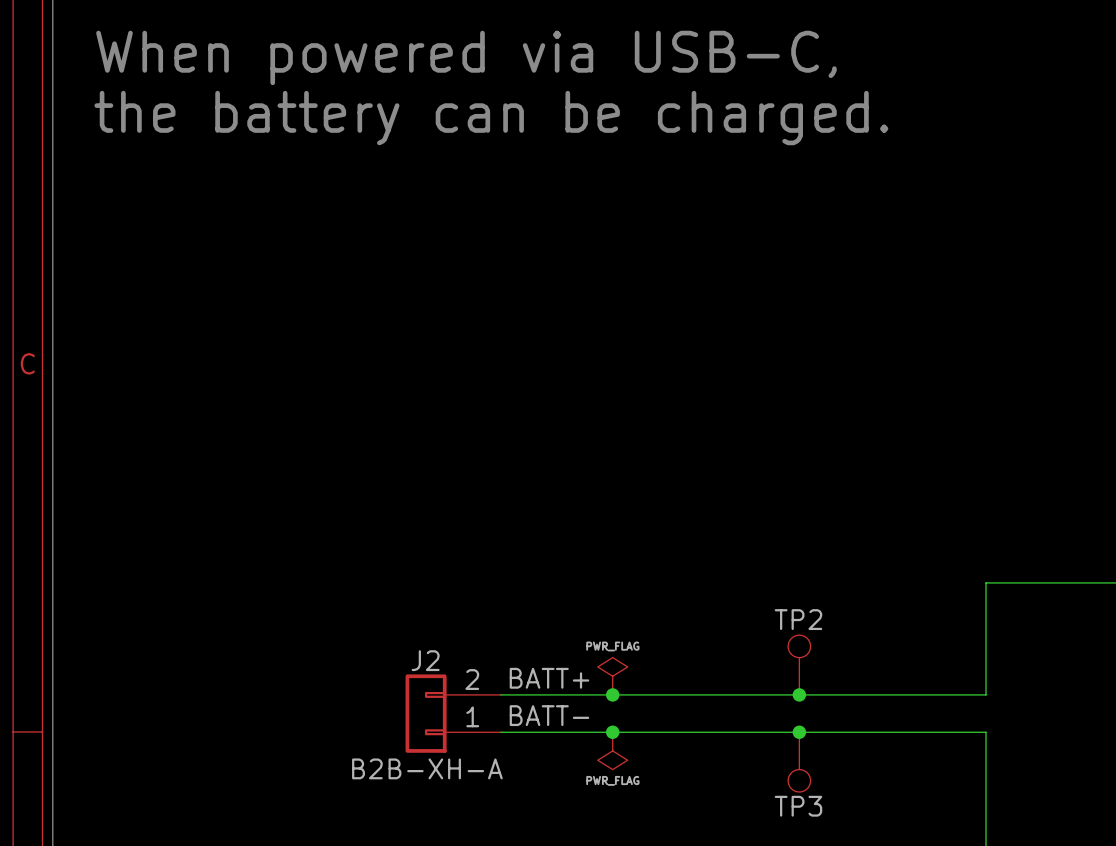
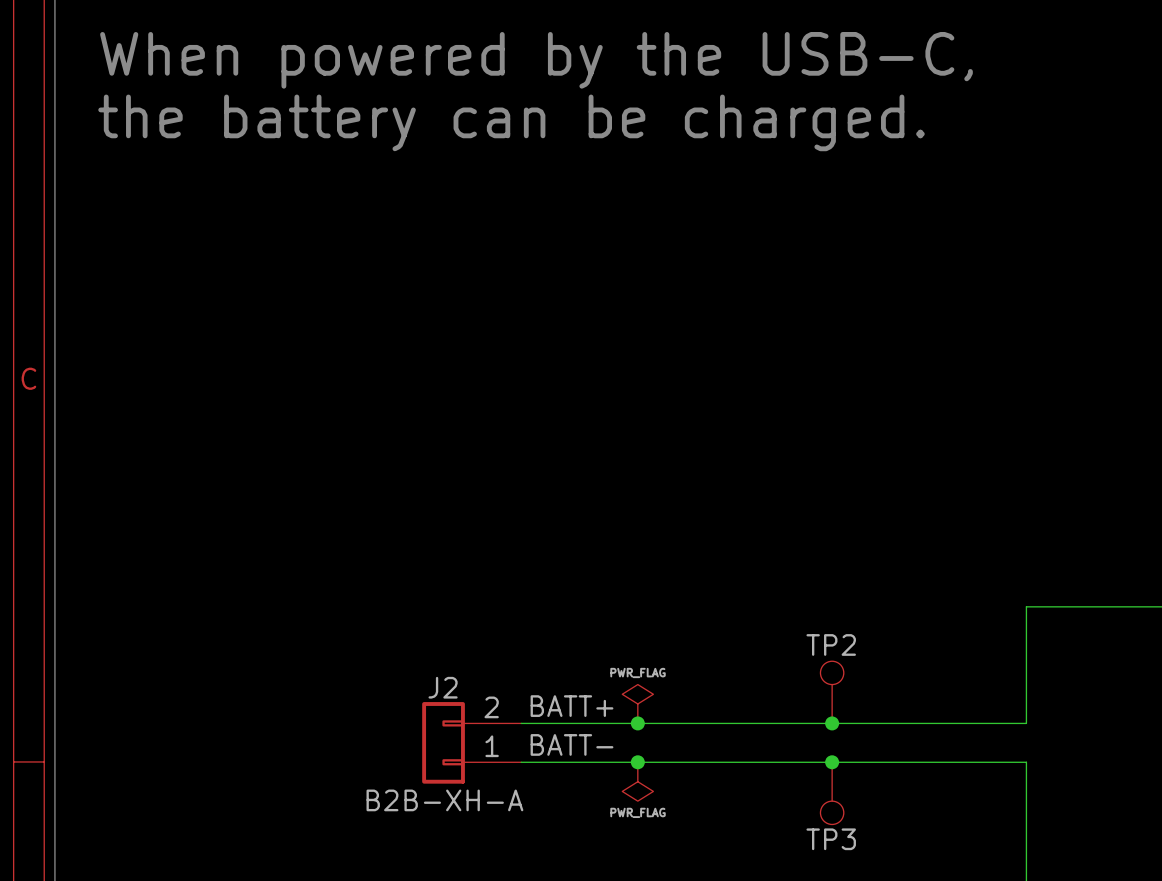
text: When powered via USB-C, (466, 57) -> When powered by the USB-C, (536, 60)

